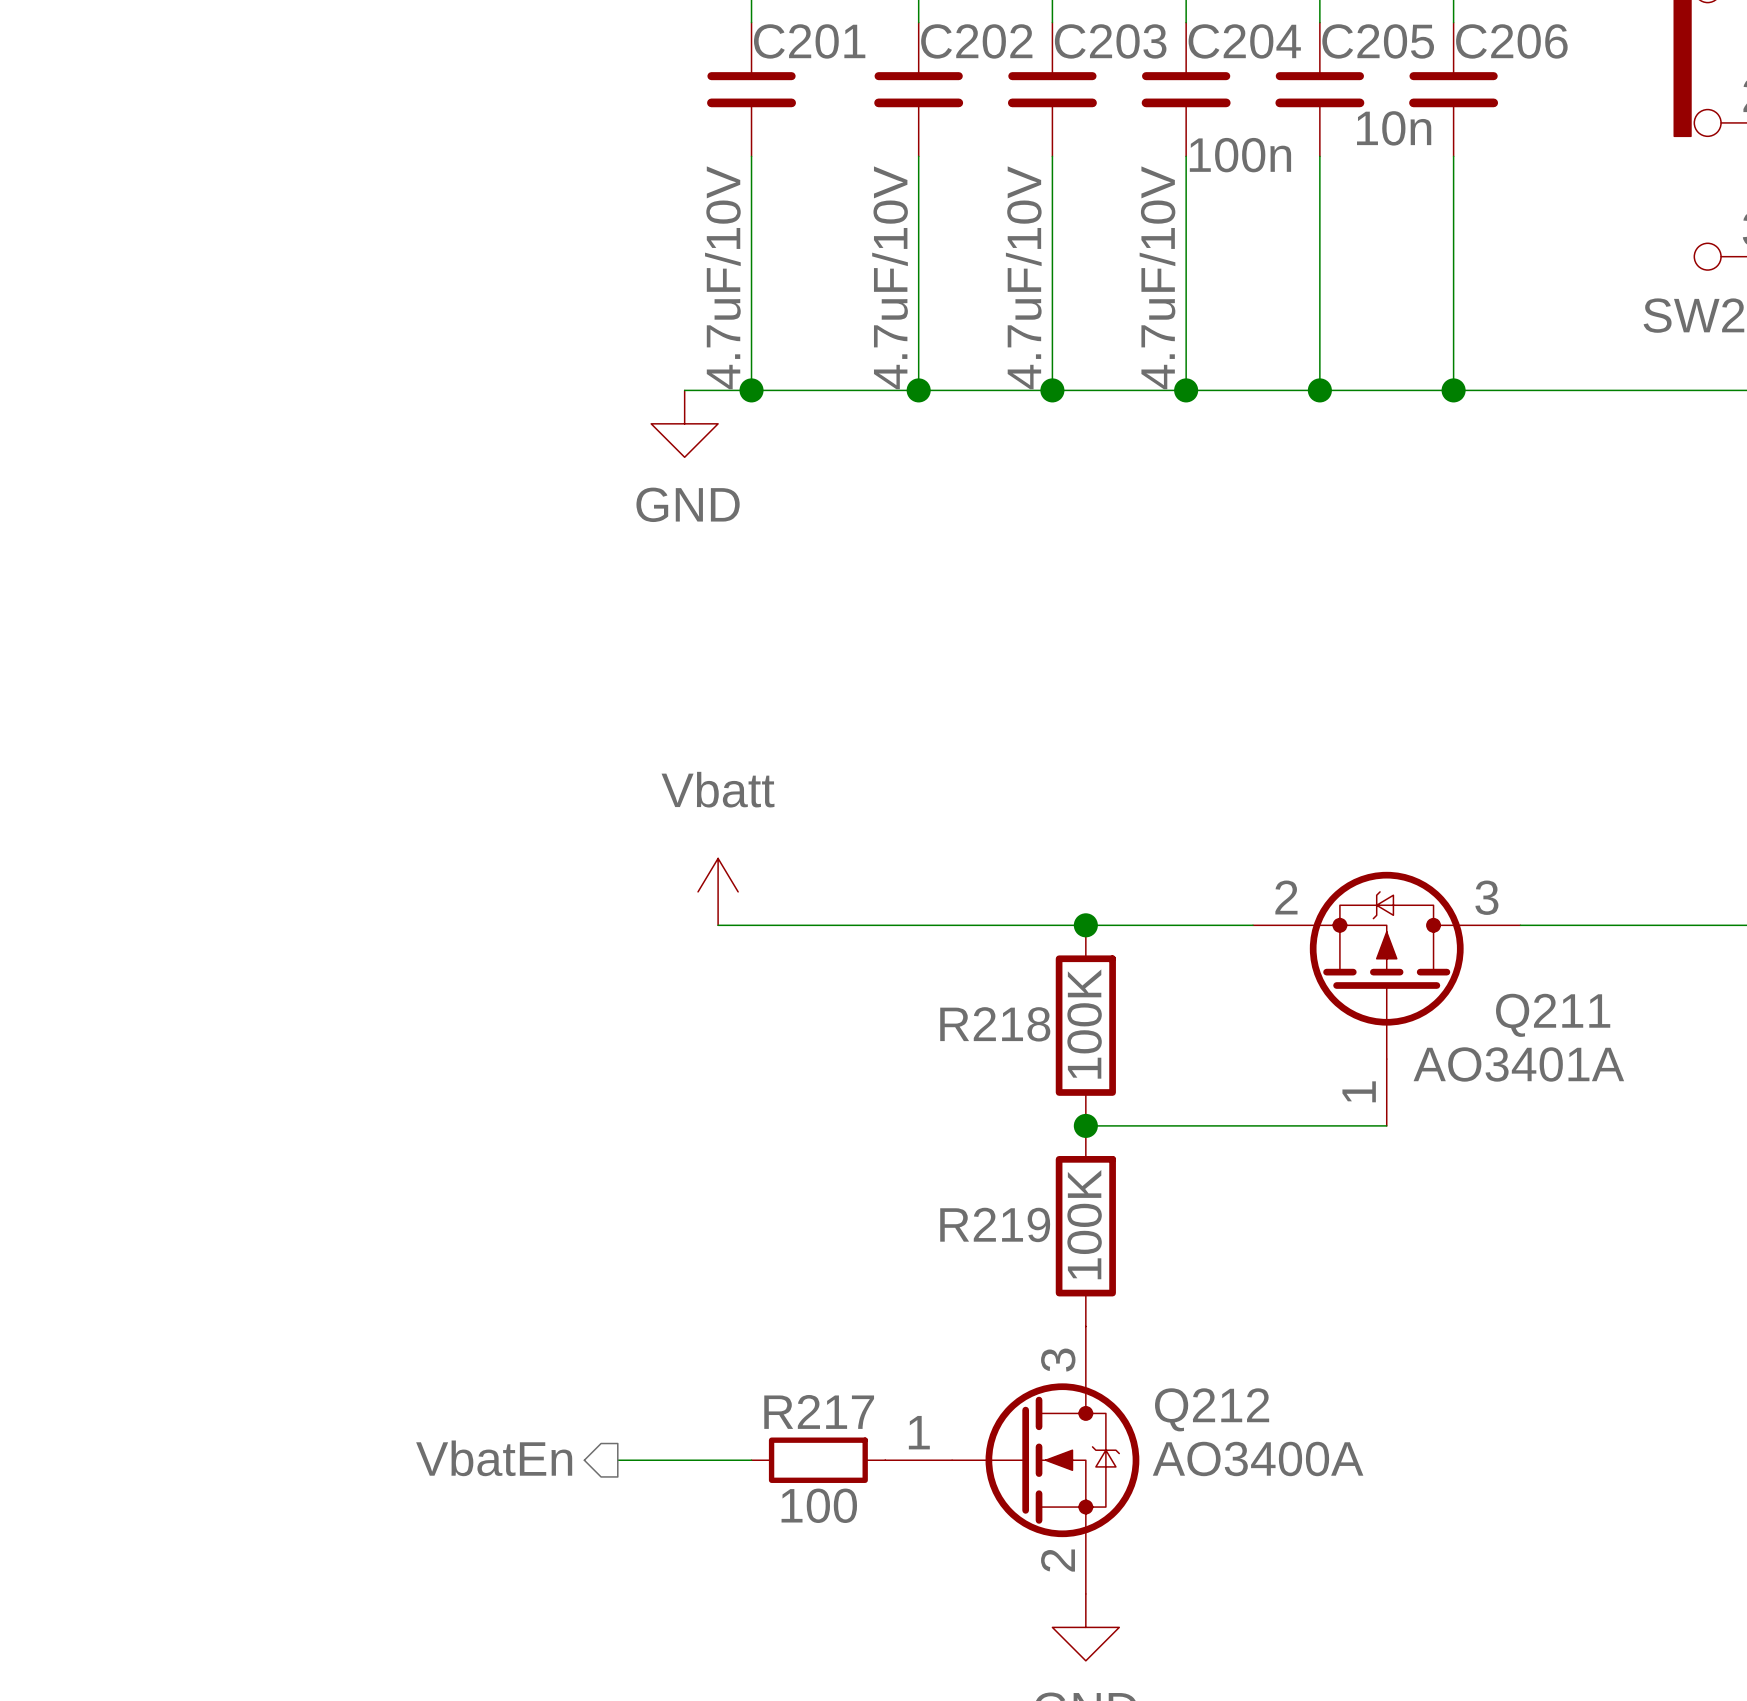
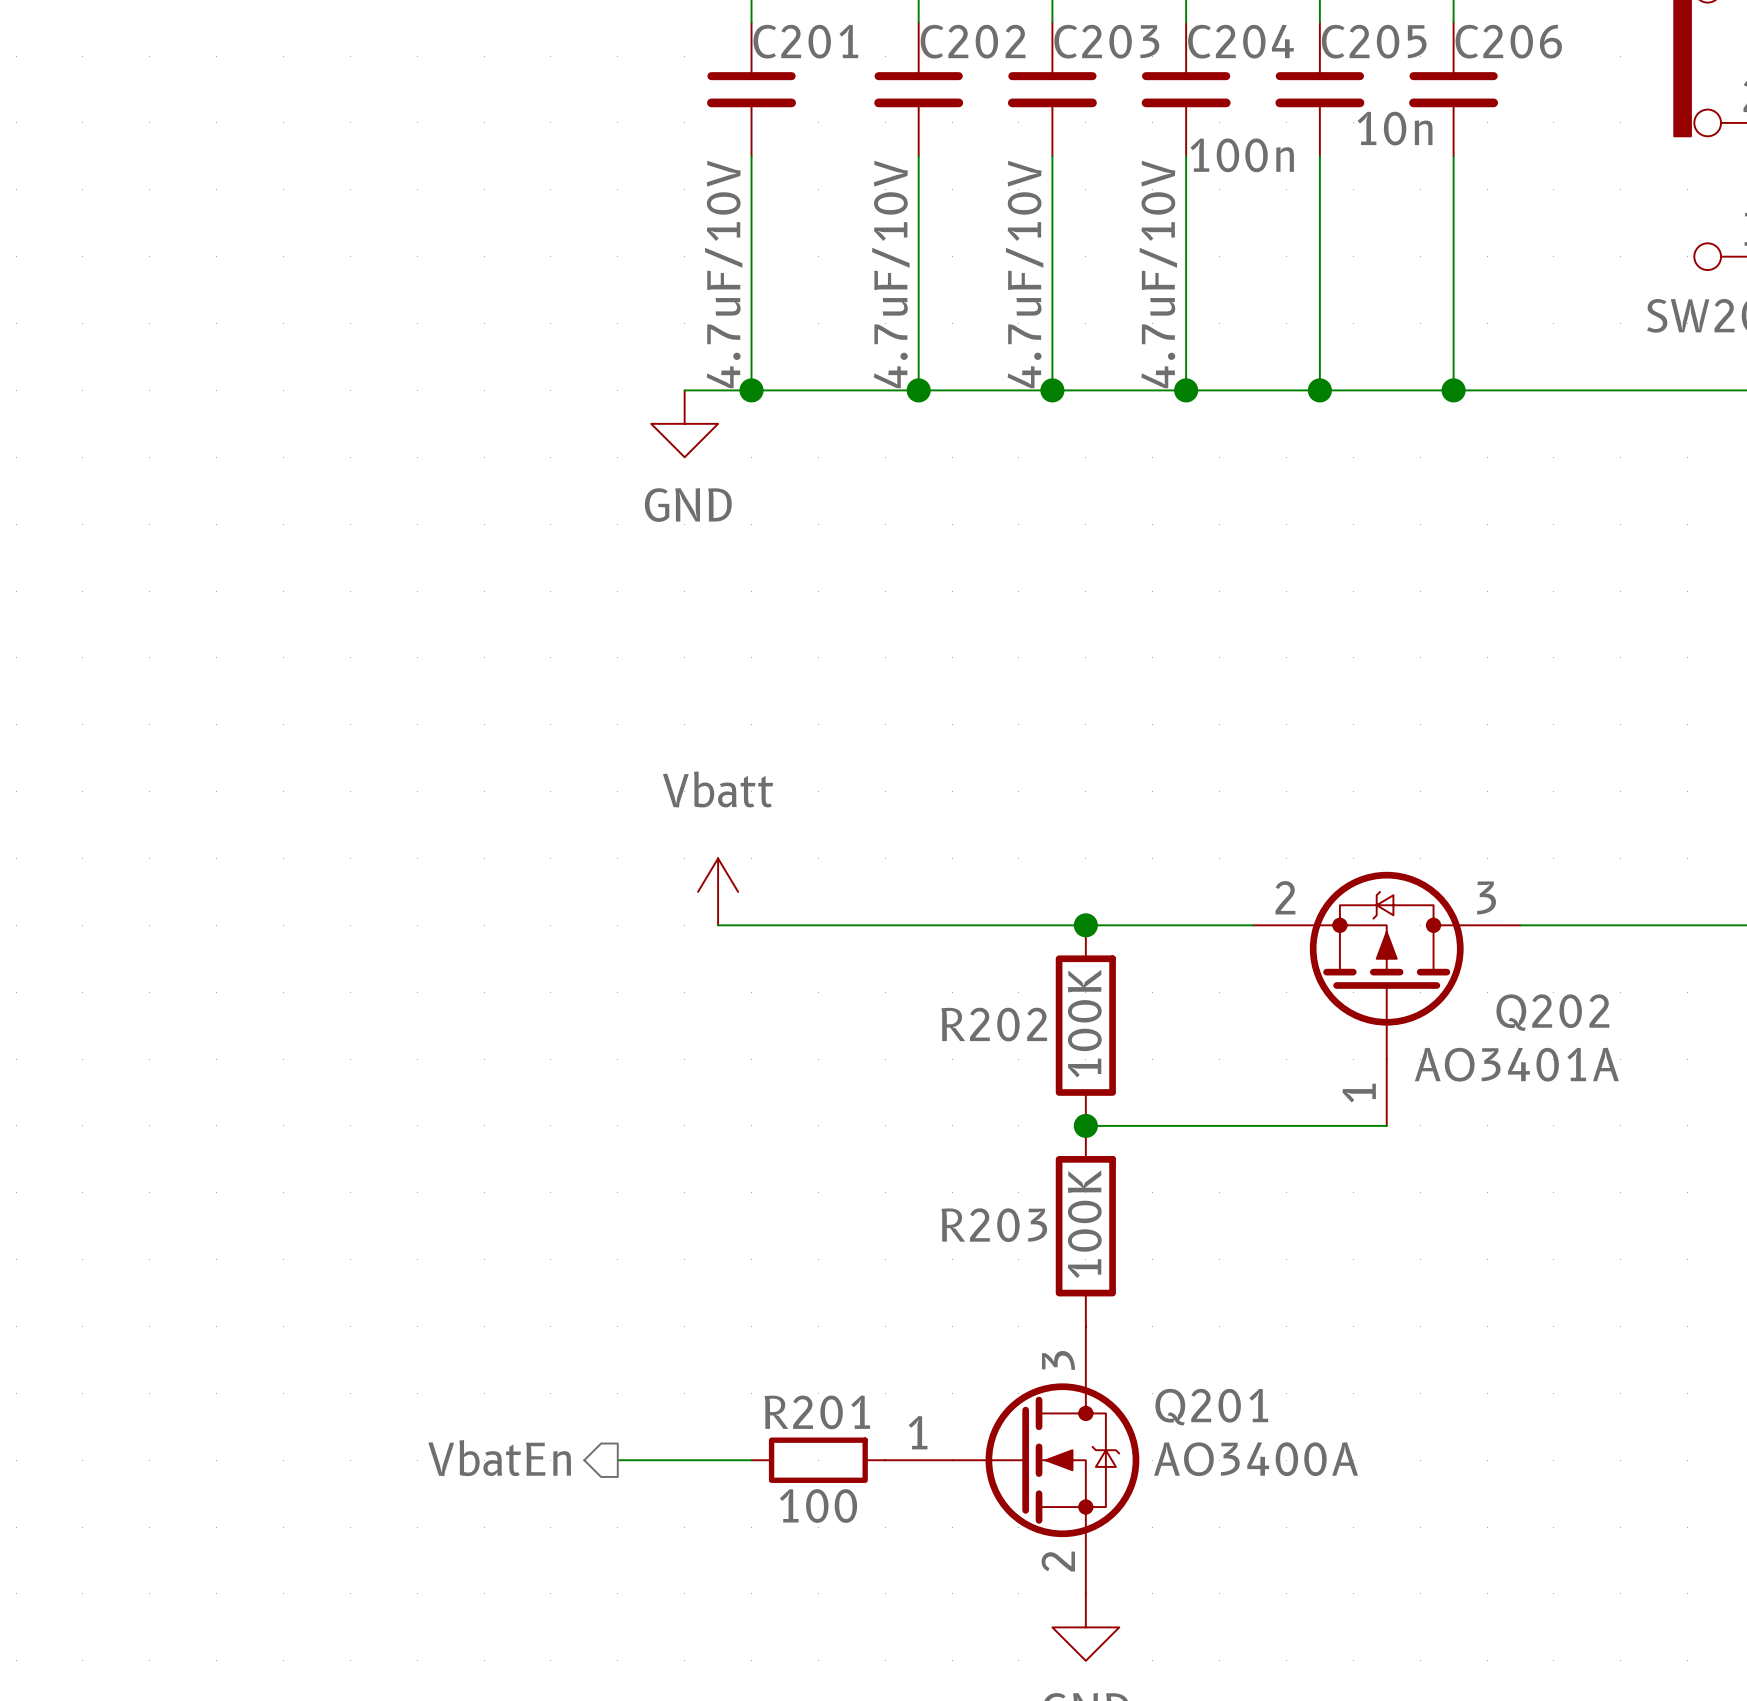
Q211 name: Q211 (1553, 1015) -> Q202 (1552, 1012)
R218 name: R218 (995, 1024) -> R202 (994, 1024)
R219 name: R219 (995, 1224) -> R203 (994, 1225)
Q212 name: Q212 (1212, 1409) -> Q201 (1211, 1407)
R217 name: R217 (819, 1411) -> R201 (817, 1412)

